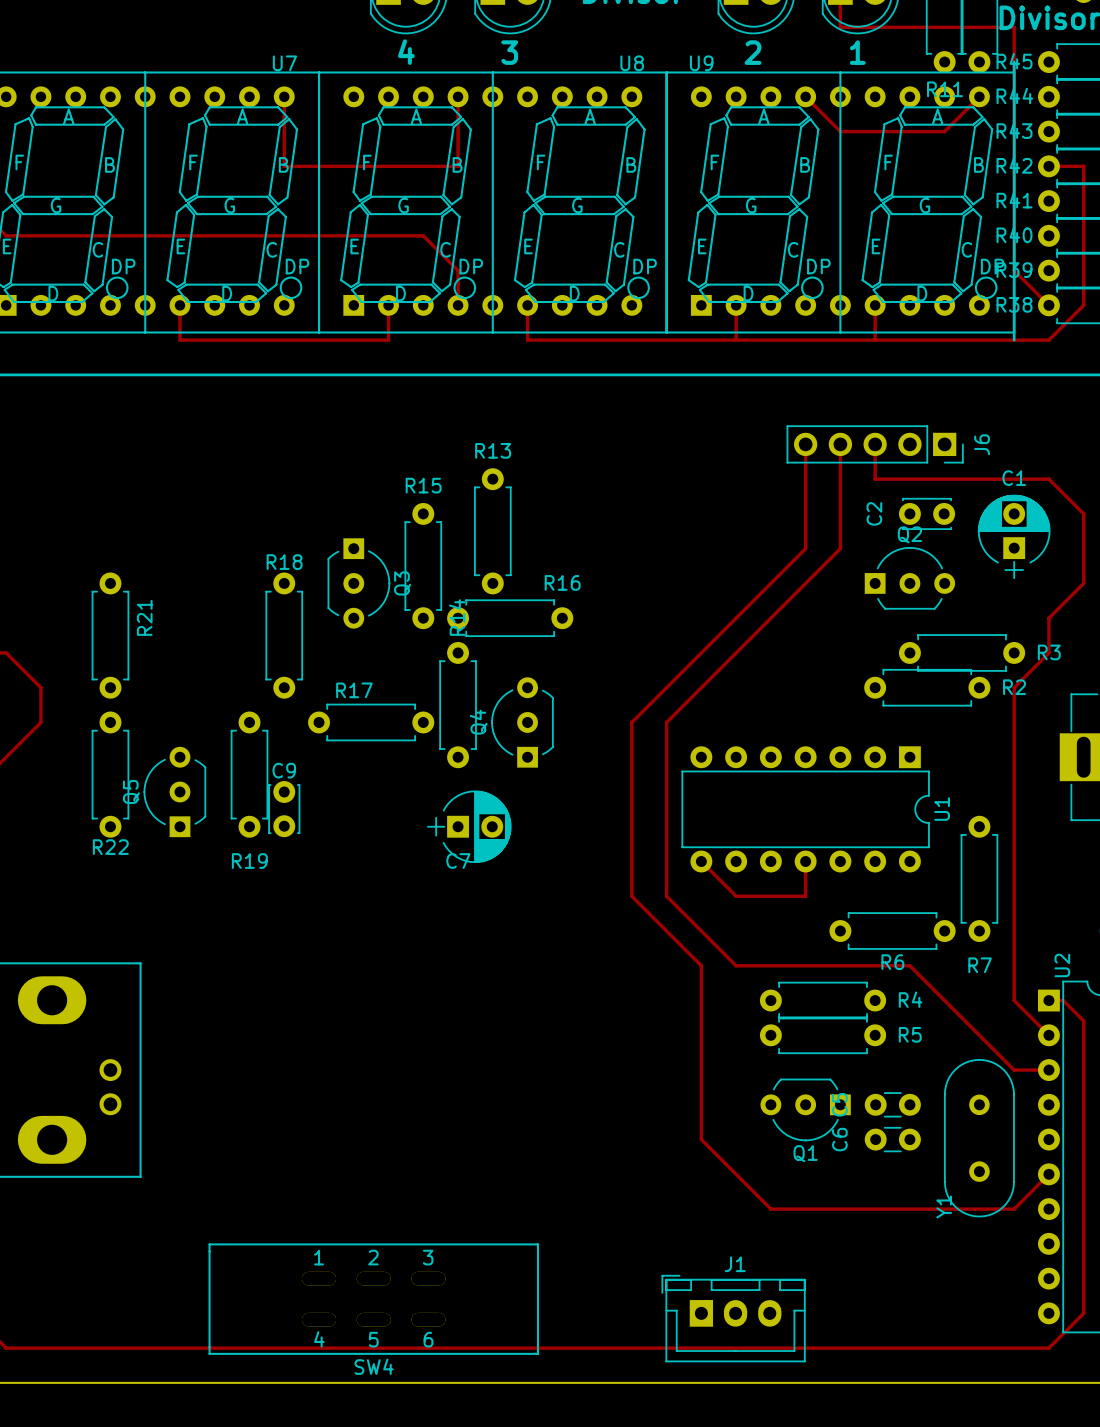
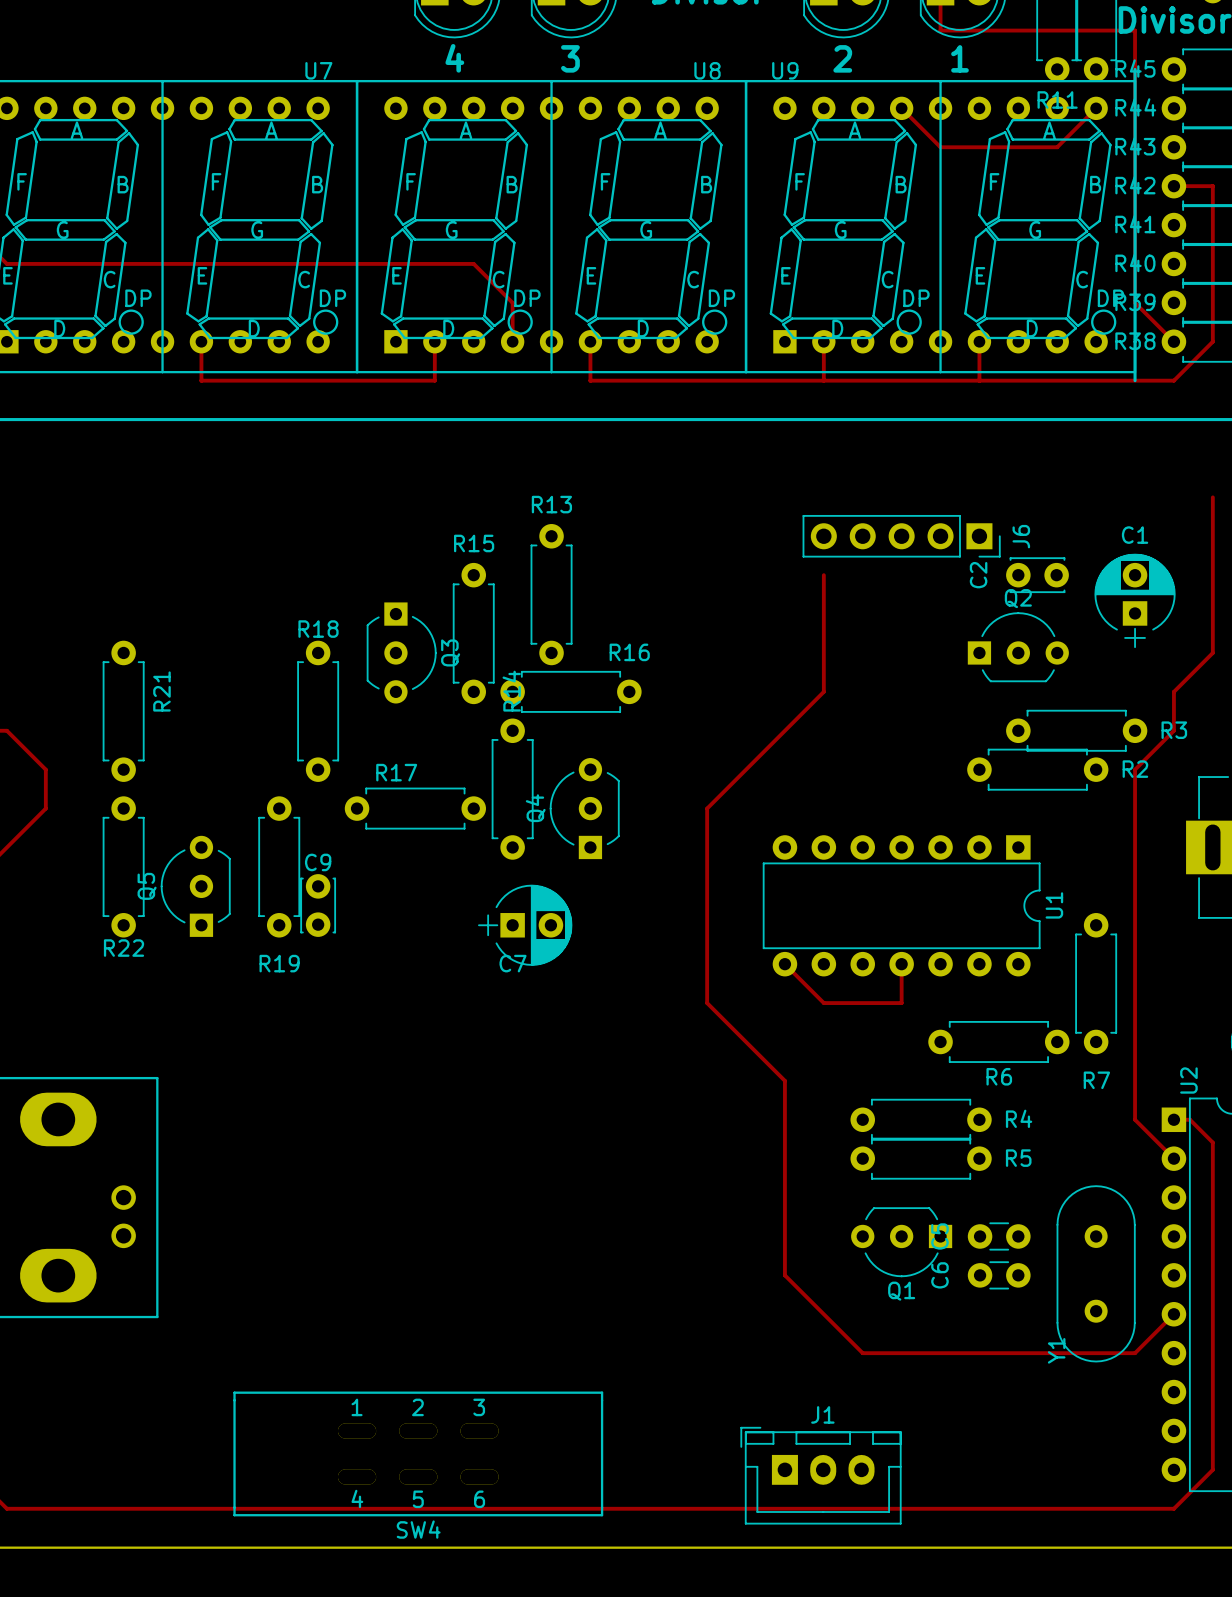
track: (284, 96) (284, 166) (458, 166) (458, 96) -> none
track: (805, 444) (805, 548) (736, 618) -> (823, 575) (823, 691)
track: (840, 444) (840, 548) (666, 722) (666, 896) (736, 965) (909, 965) (1014, 1070) (1048, 1070) -> none
track: (875, 444) (875, 479) (1048, 479) (1083, 513) -> (1212, 497) (1212, 575)
J6 position: (875, 444) -> (901, 536)

